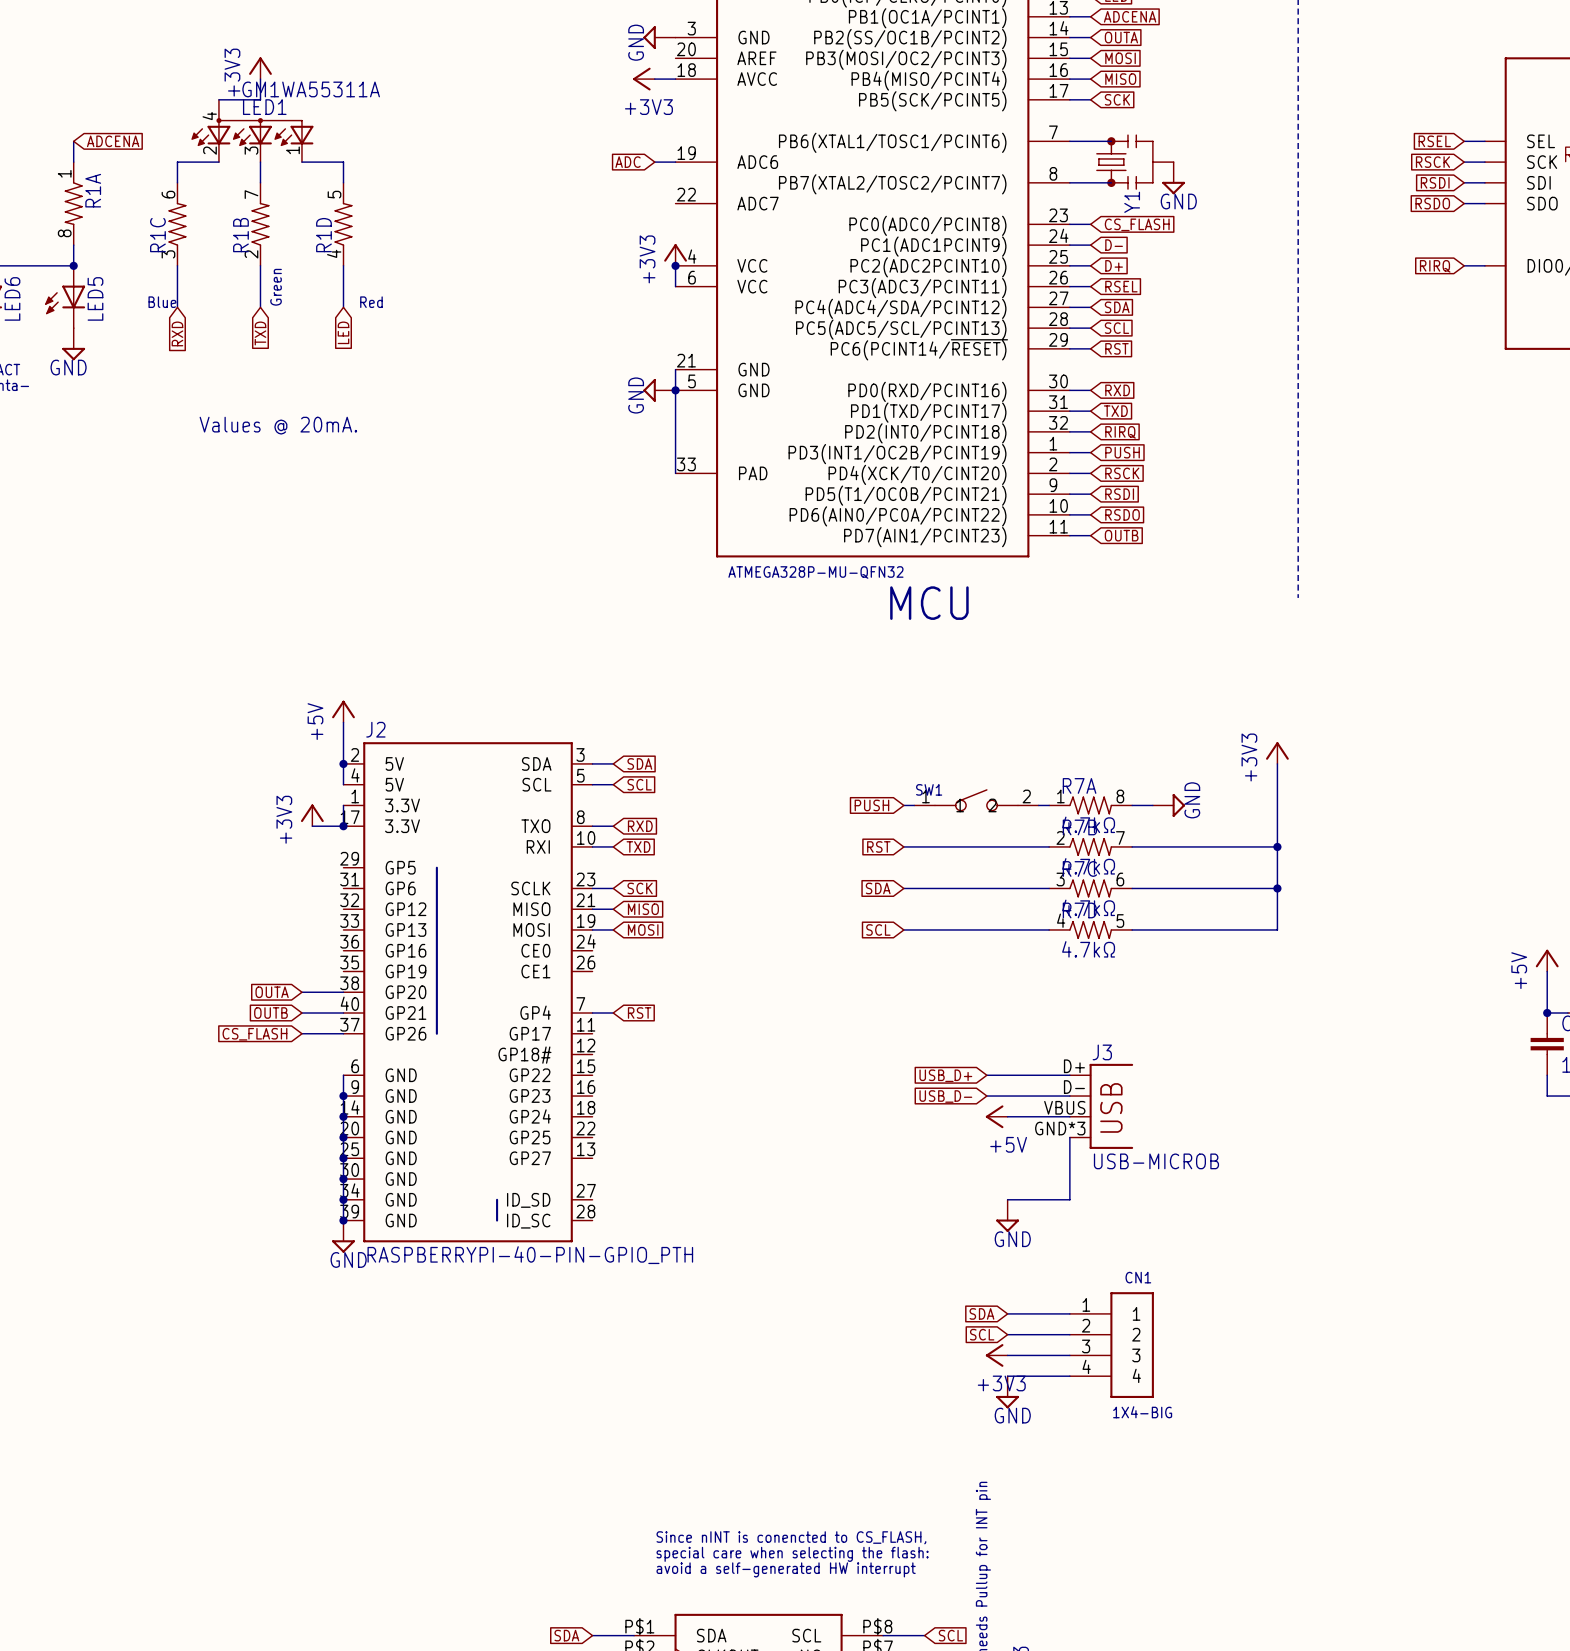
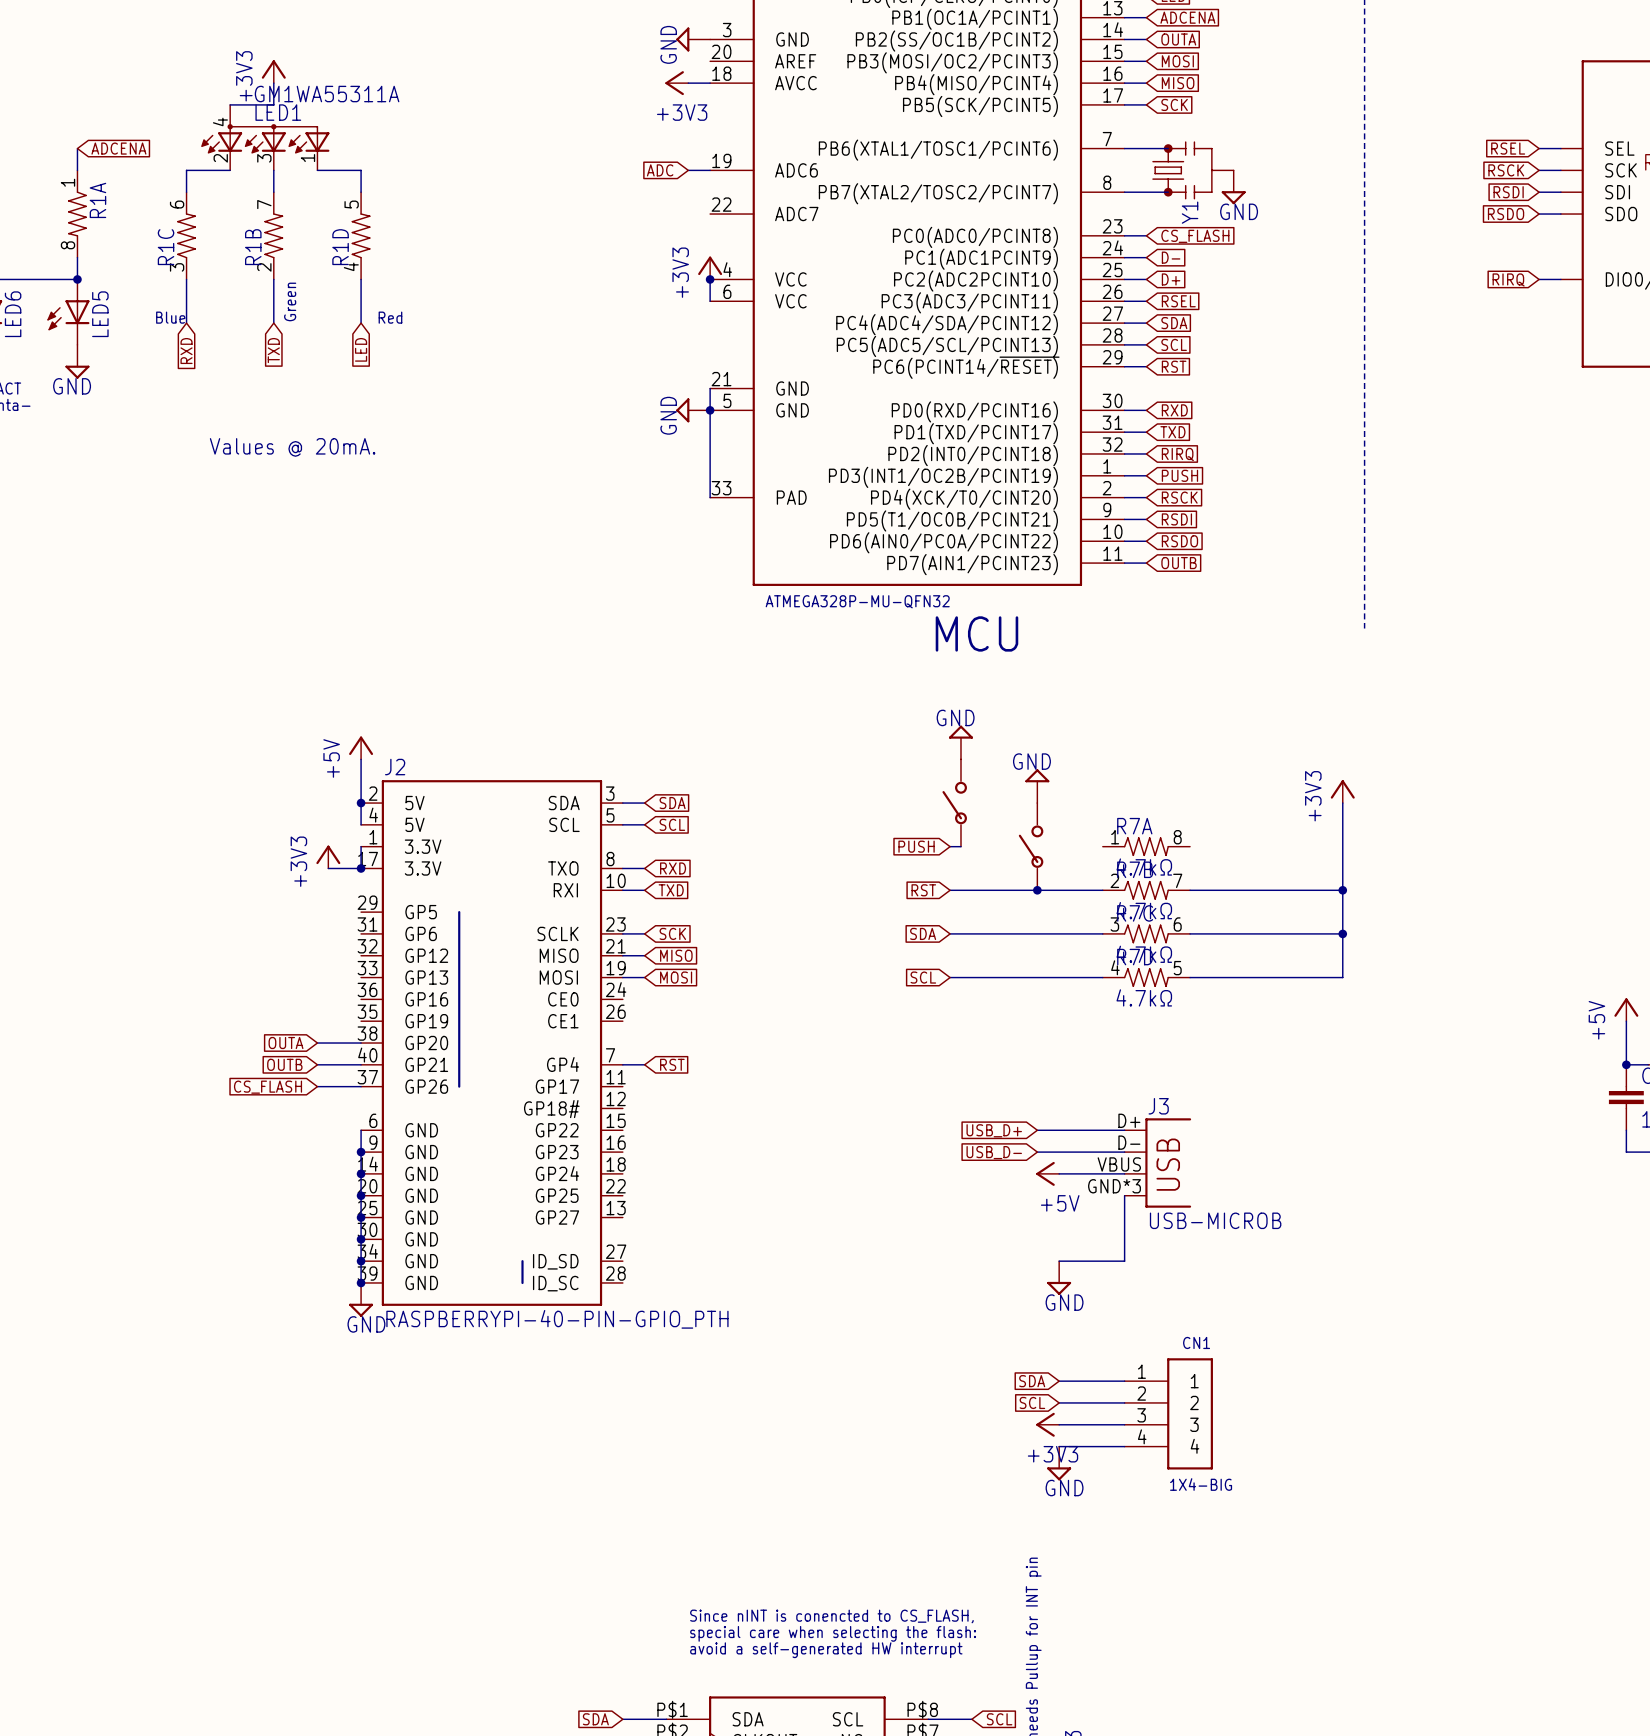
power symbol: none -> GND (960, 742)
power symbol: none -> GND (1037, 786)
part: none -> (954, 803)
SW1: (976, 800) -> none
part: none -> (1031, 846)
wire: (1038, 805) (1049, 805) -> none
wire: (1132, 805) (1152, 805) -> none
power symbol: GND (1168, 805) -> none
junction: none -> (1037, 890)

